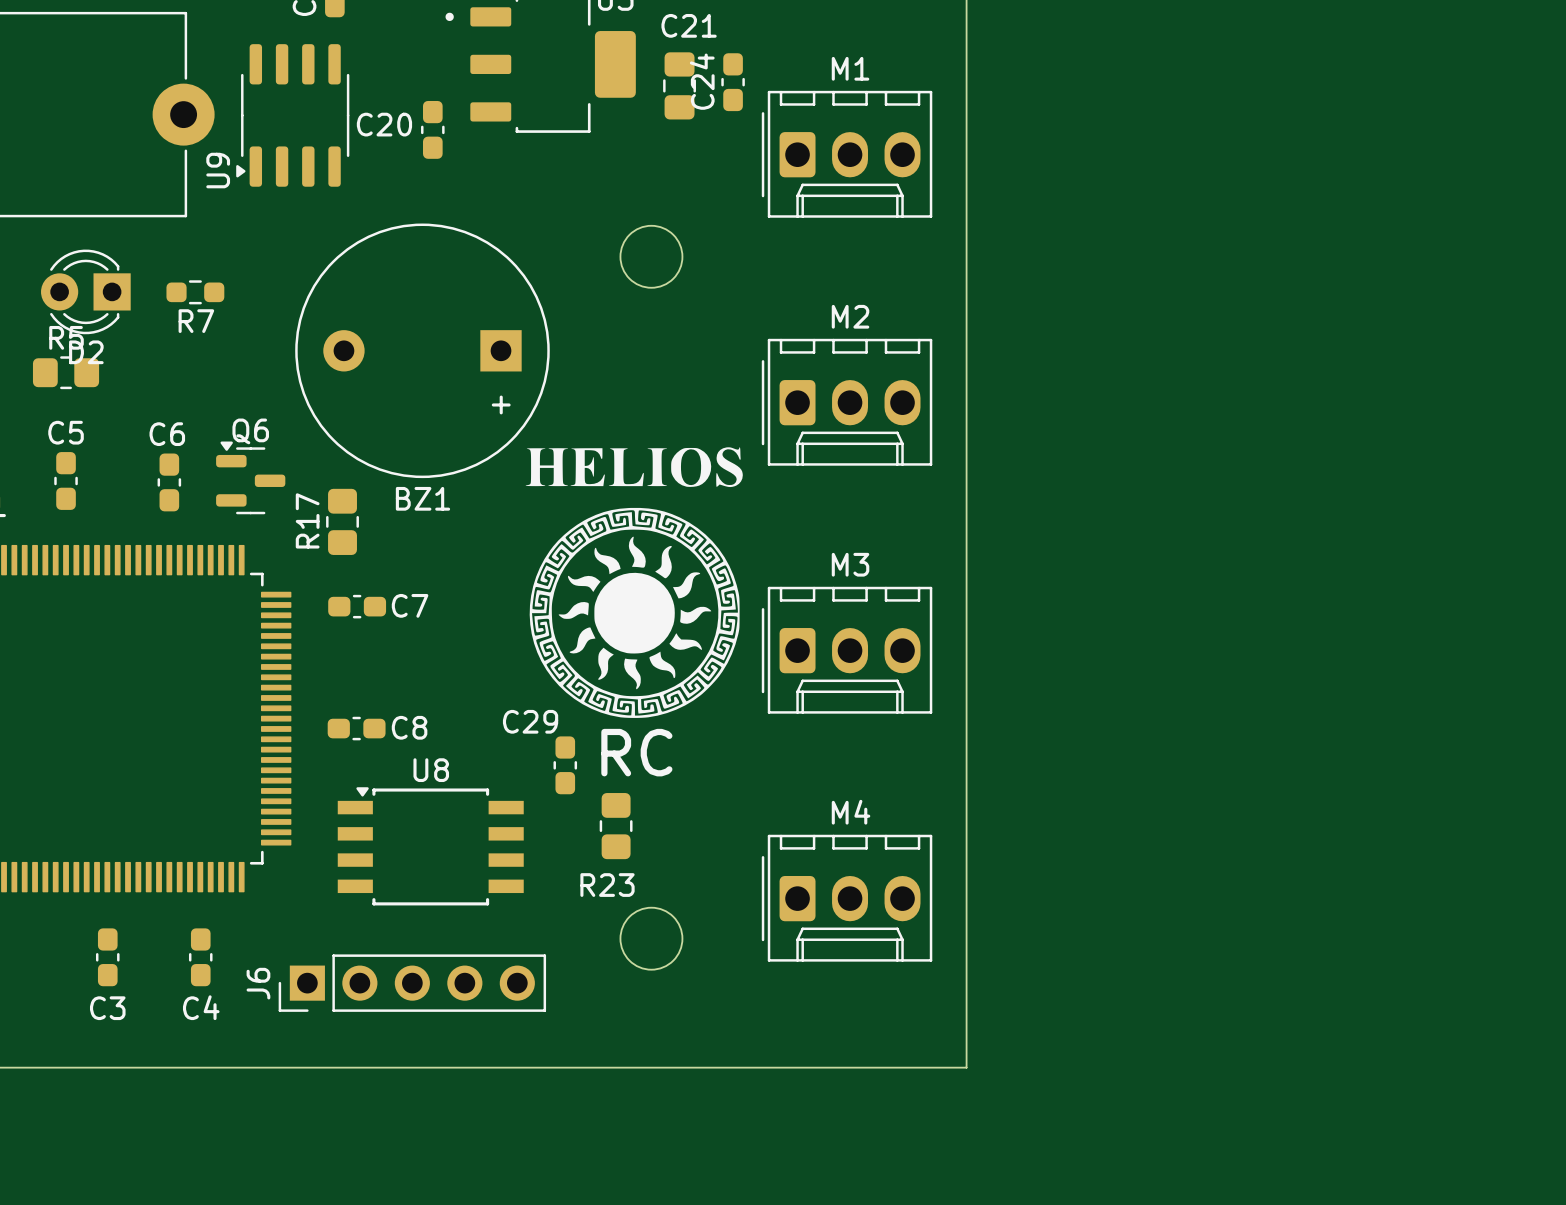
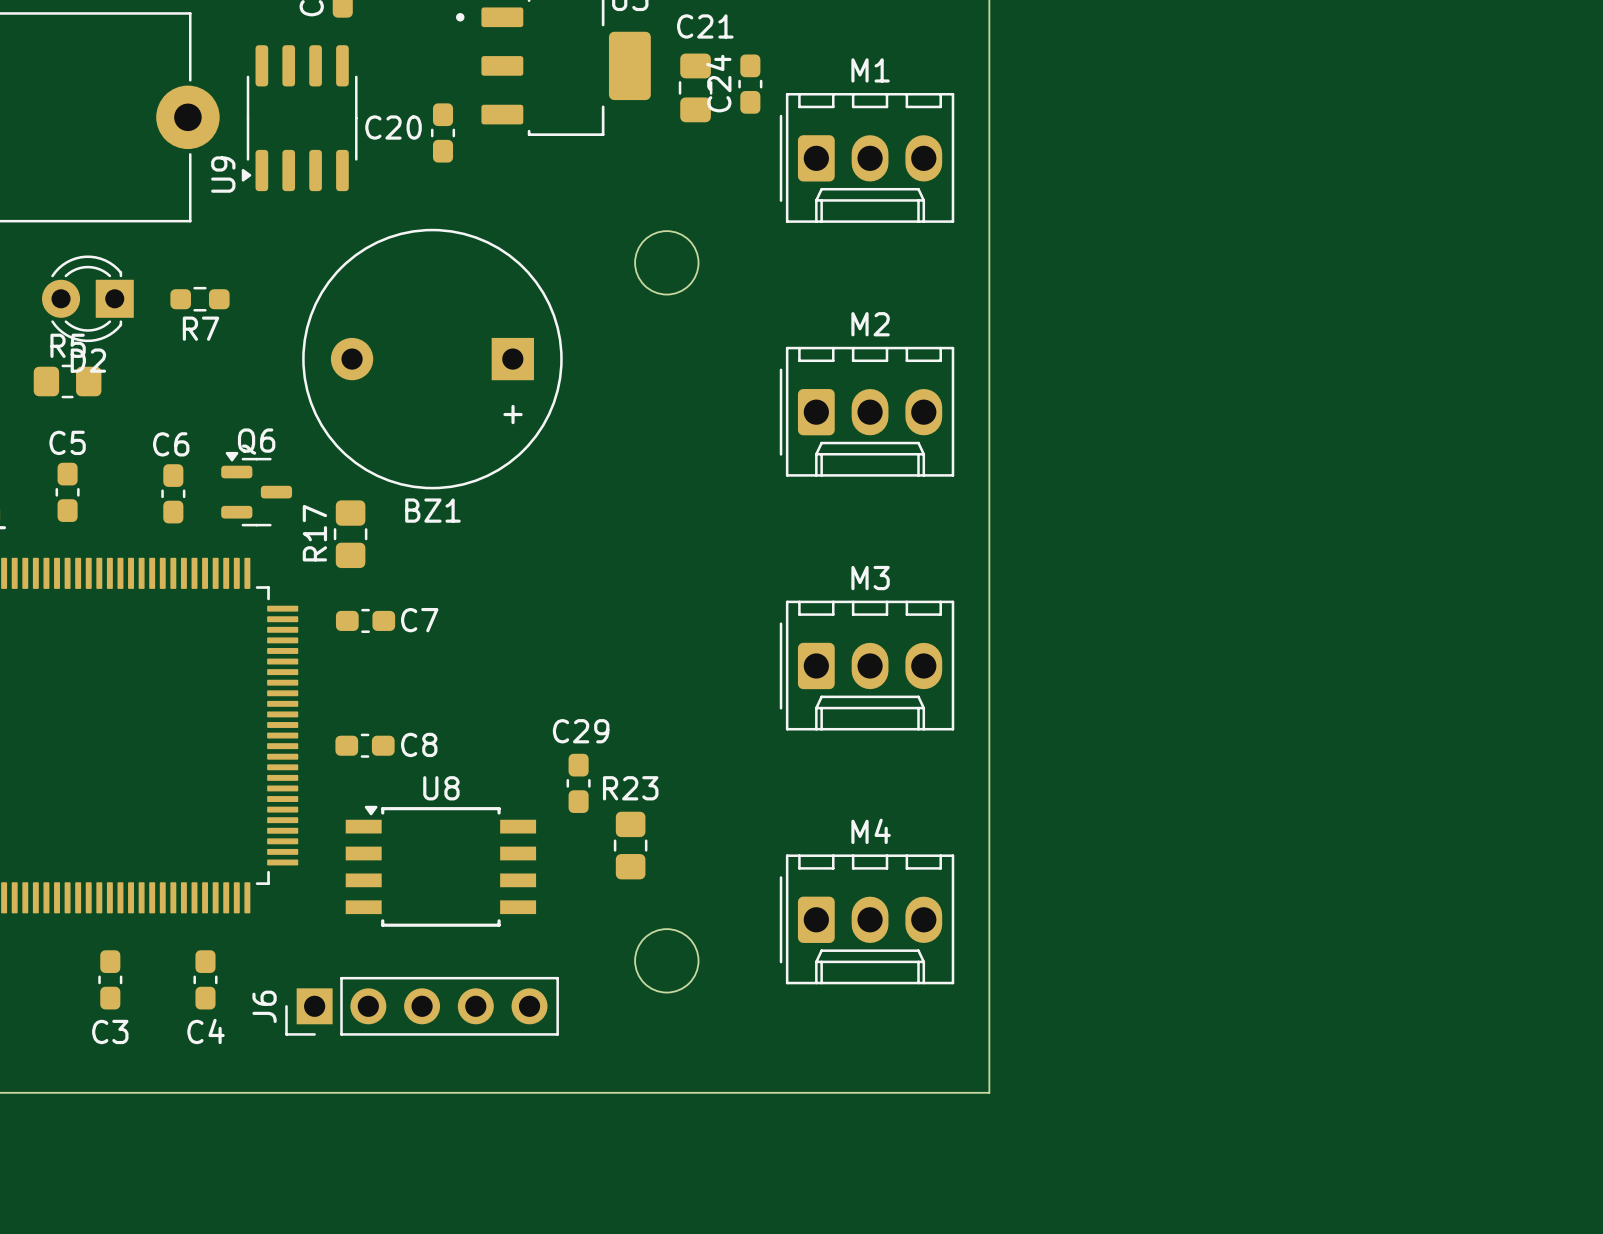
drawing: [525, 447, 743, 718] -> none
C29 name position: C29 (530, 721) -> C29 (581, 731)
text: RC (636, 752) -> none
R23 name position: R23 (607, 885) -> R23 (630, 788)

